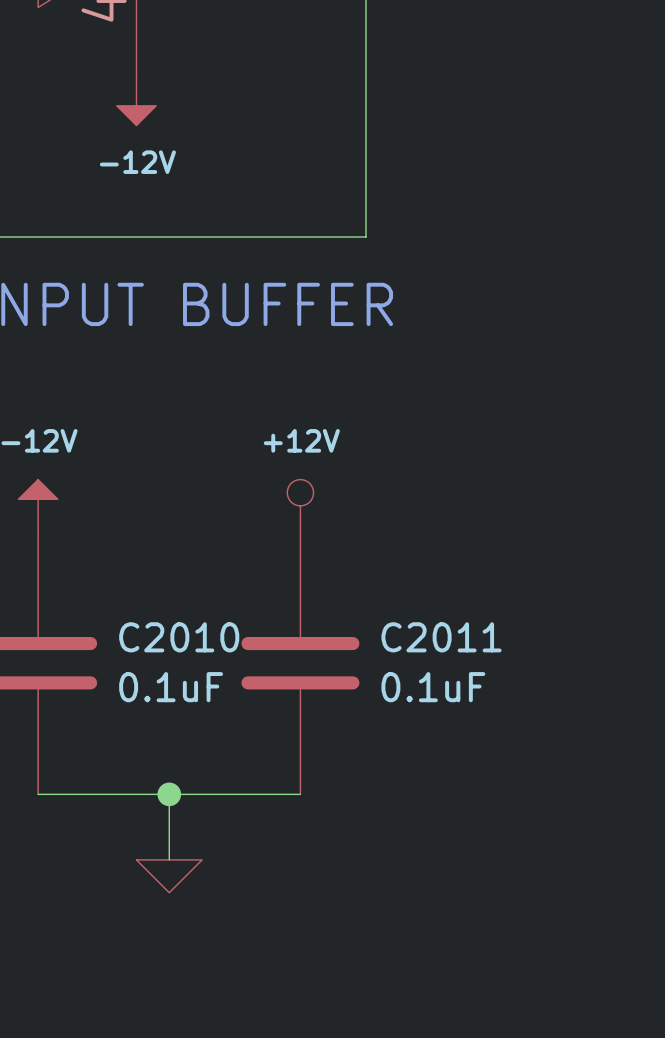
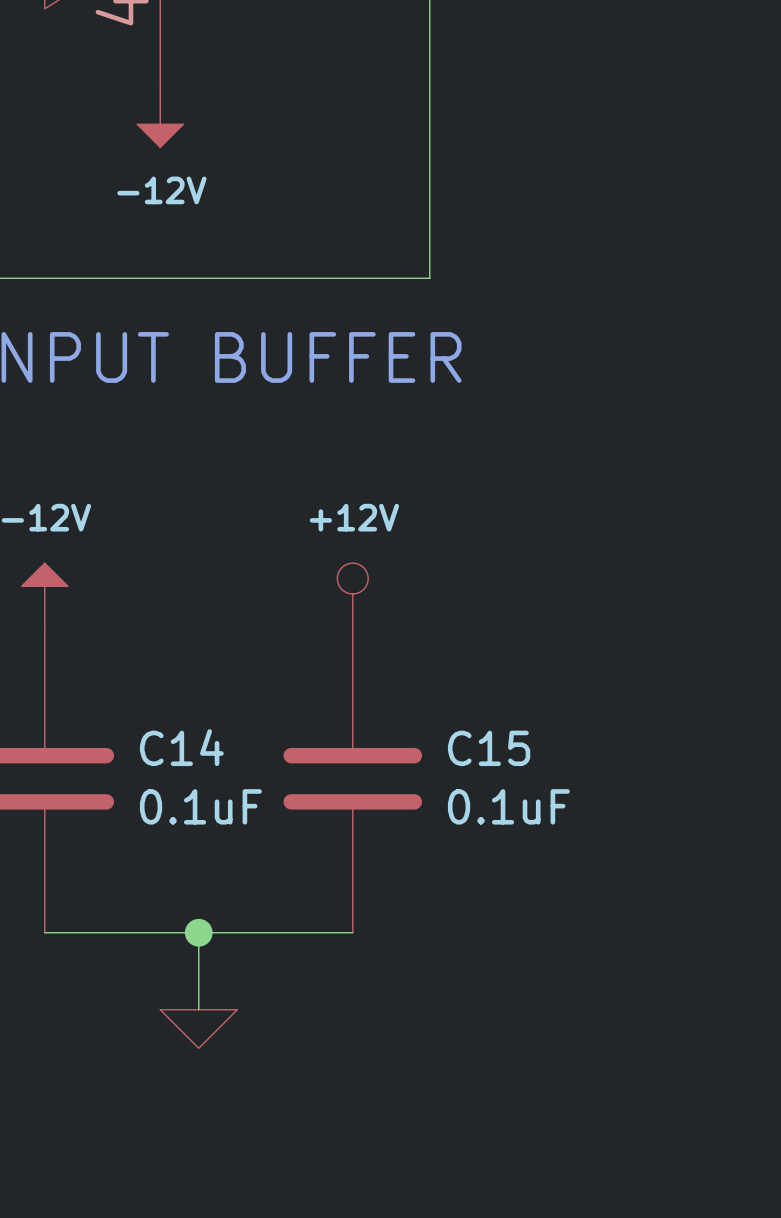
C2010 name: C2010 (179, 637) -> C14 (181, 747)
C2011 name: C2011 (441, 637) -> C15 (489, 748)

